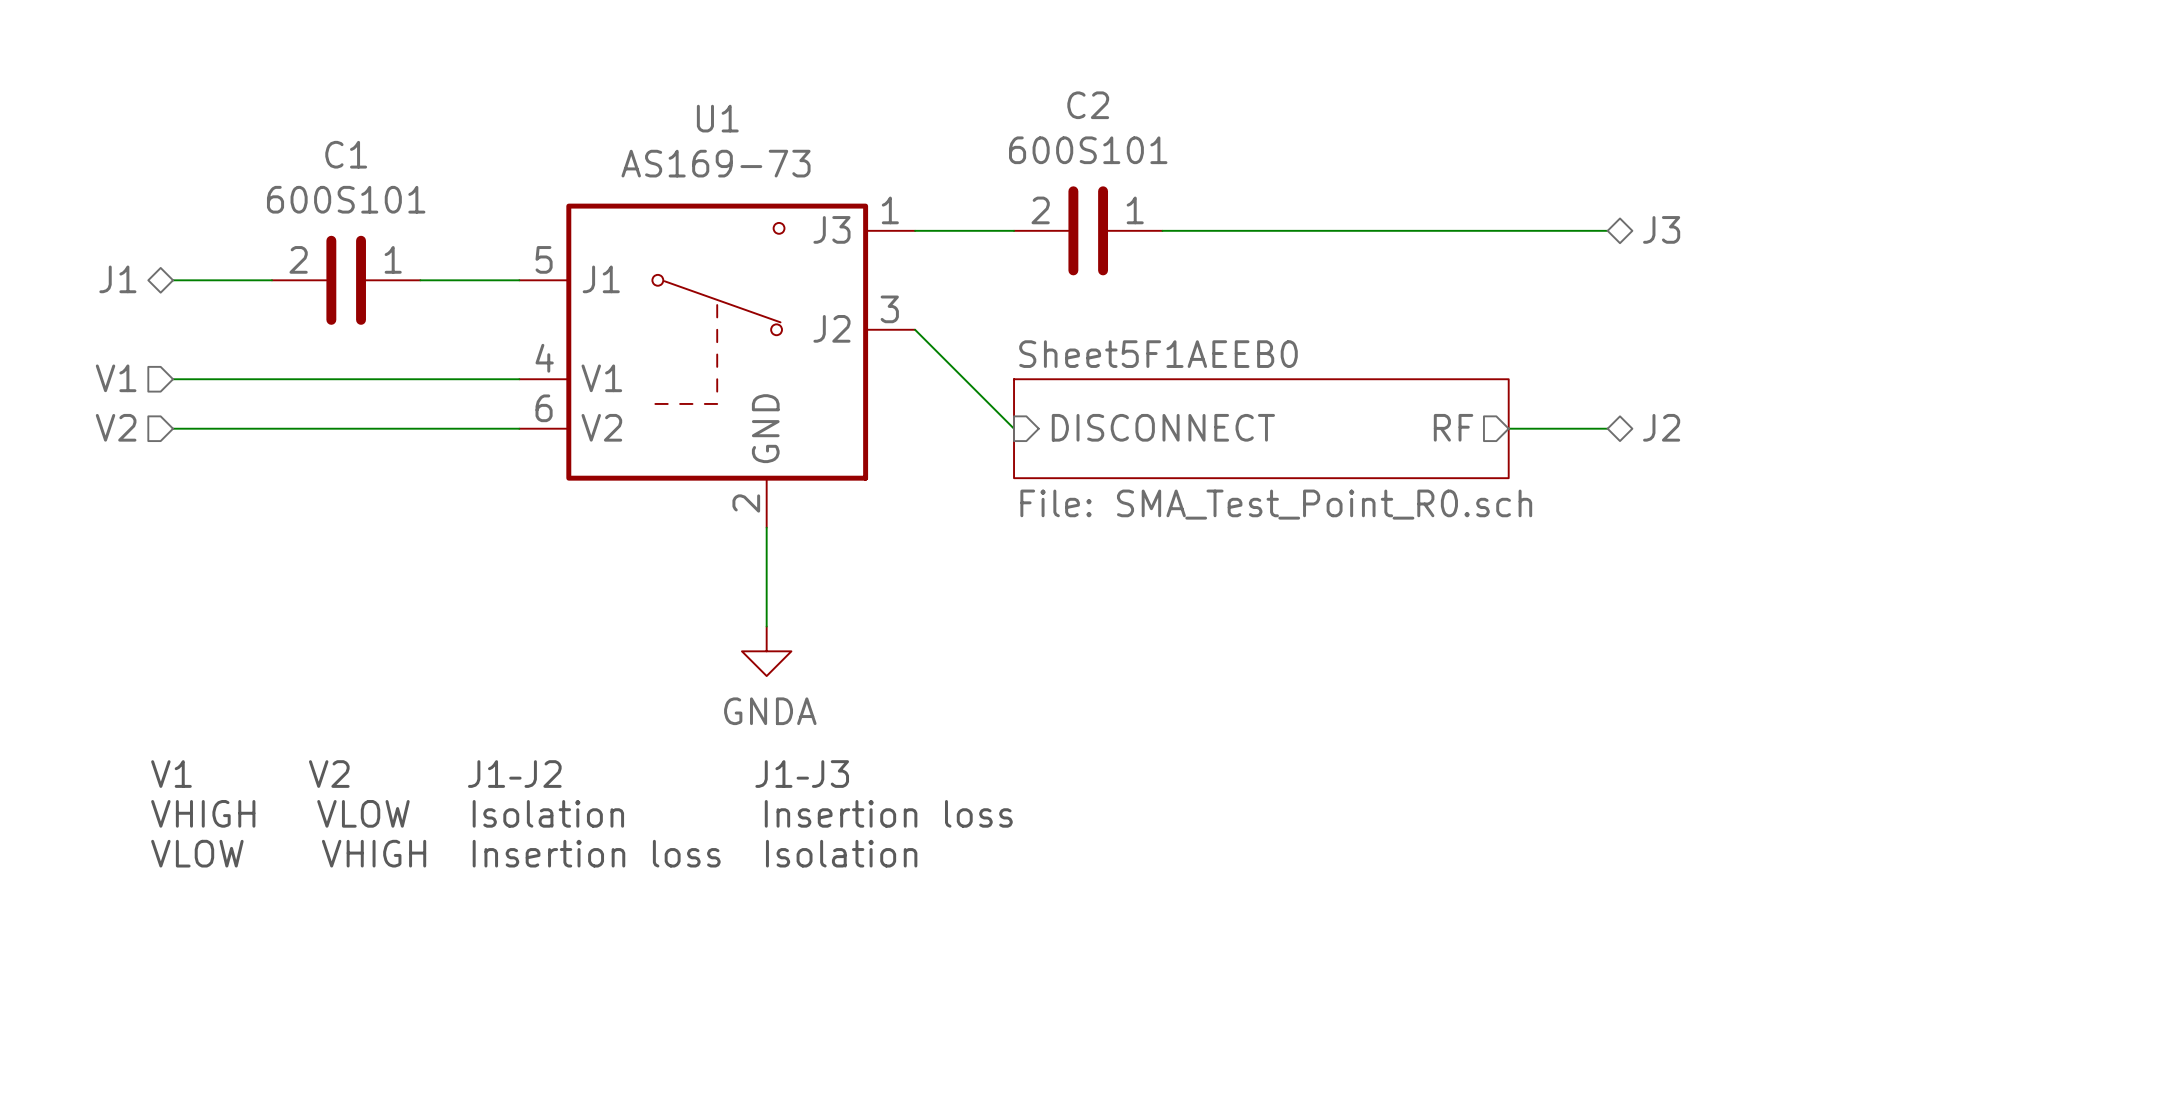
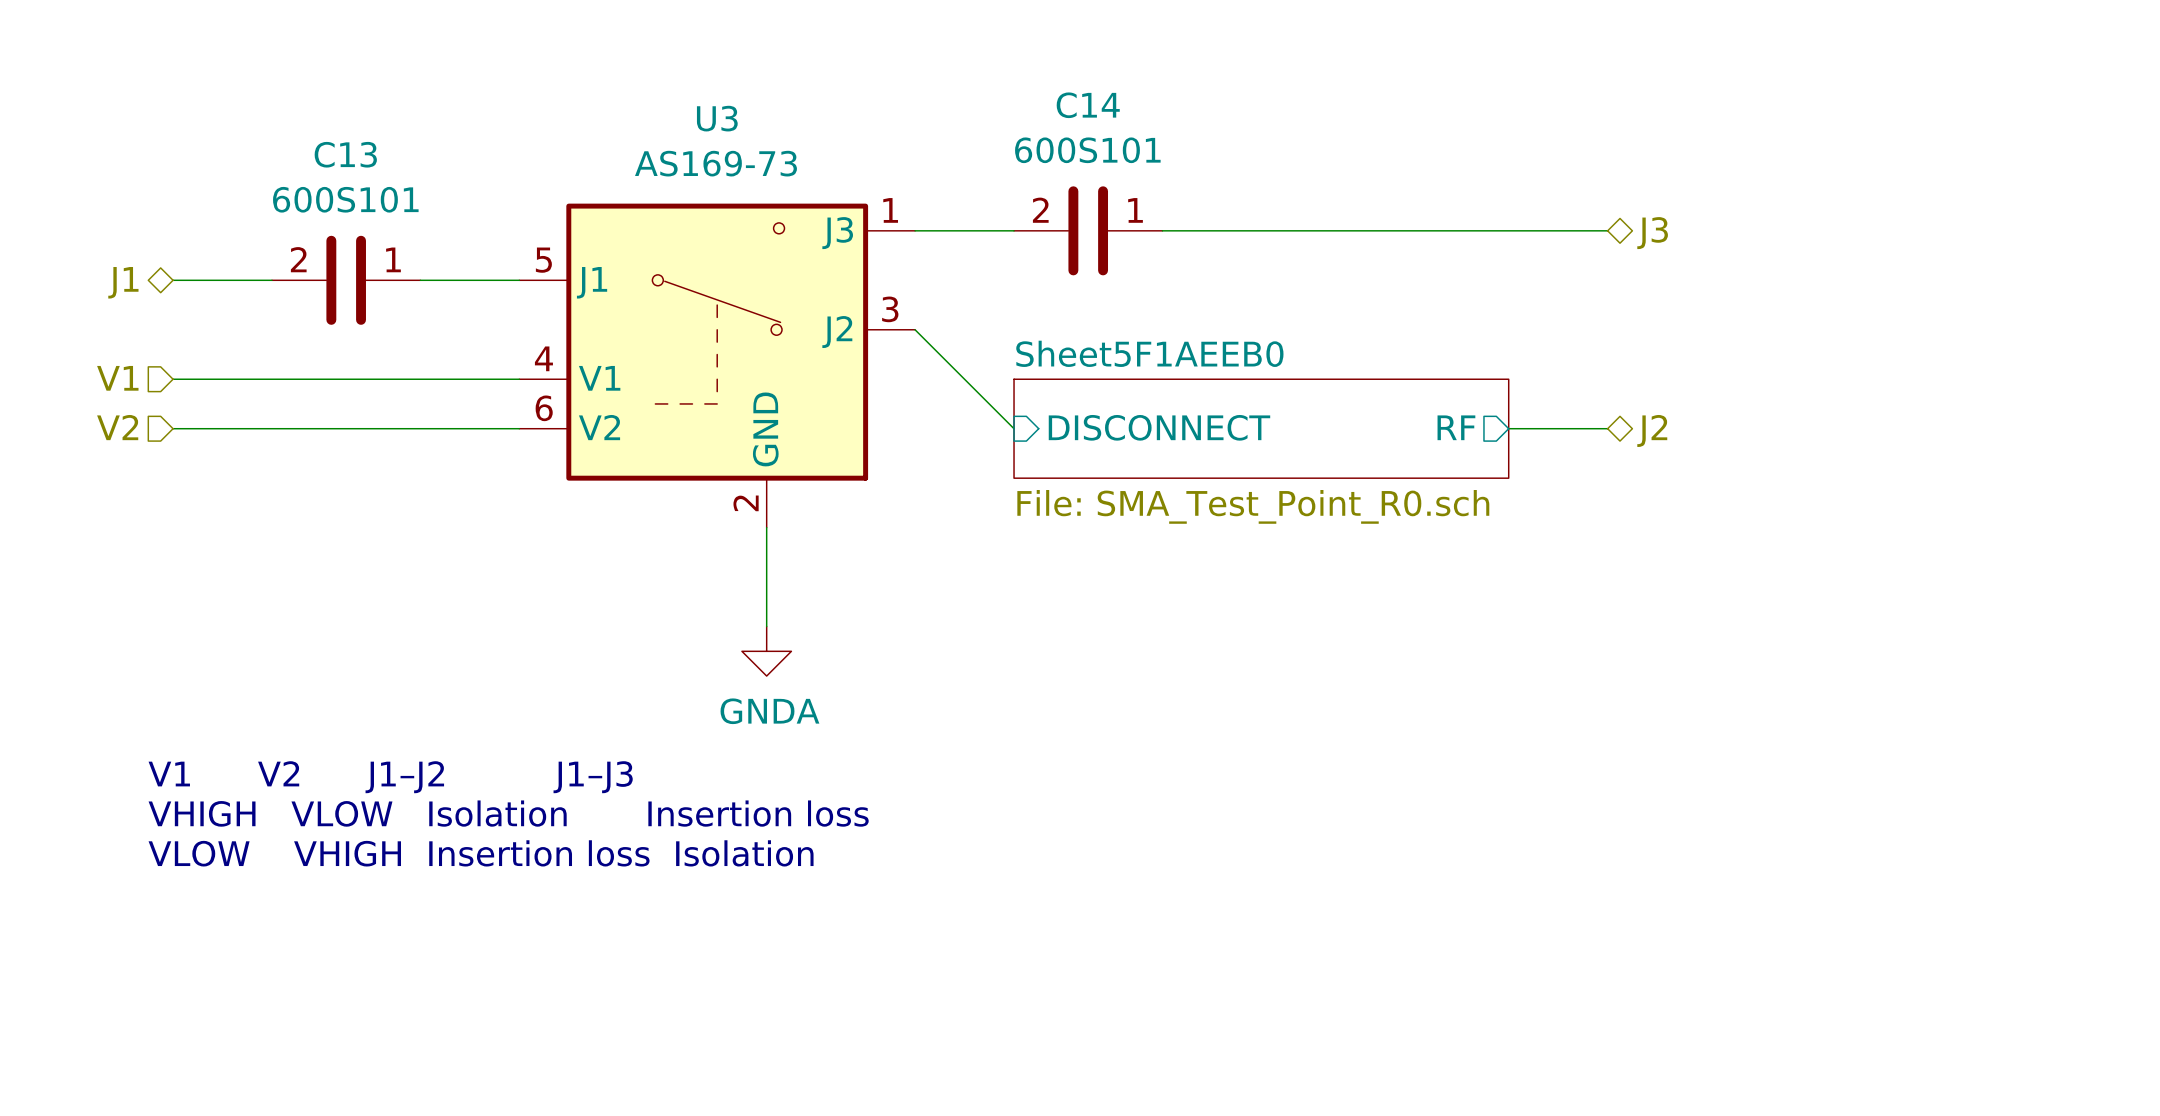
C2 name: C2 (1088, 105) -> C14 (1088, 105)
U1 name: U1 (717, 118) -> U3 (717, 118)
C1 name: C1 (346, 154) -> C13 (345, 154)

